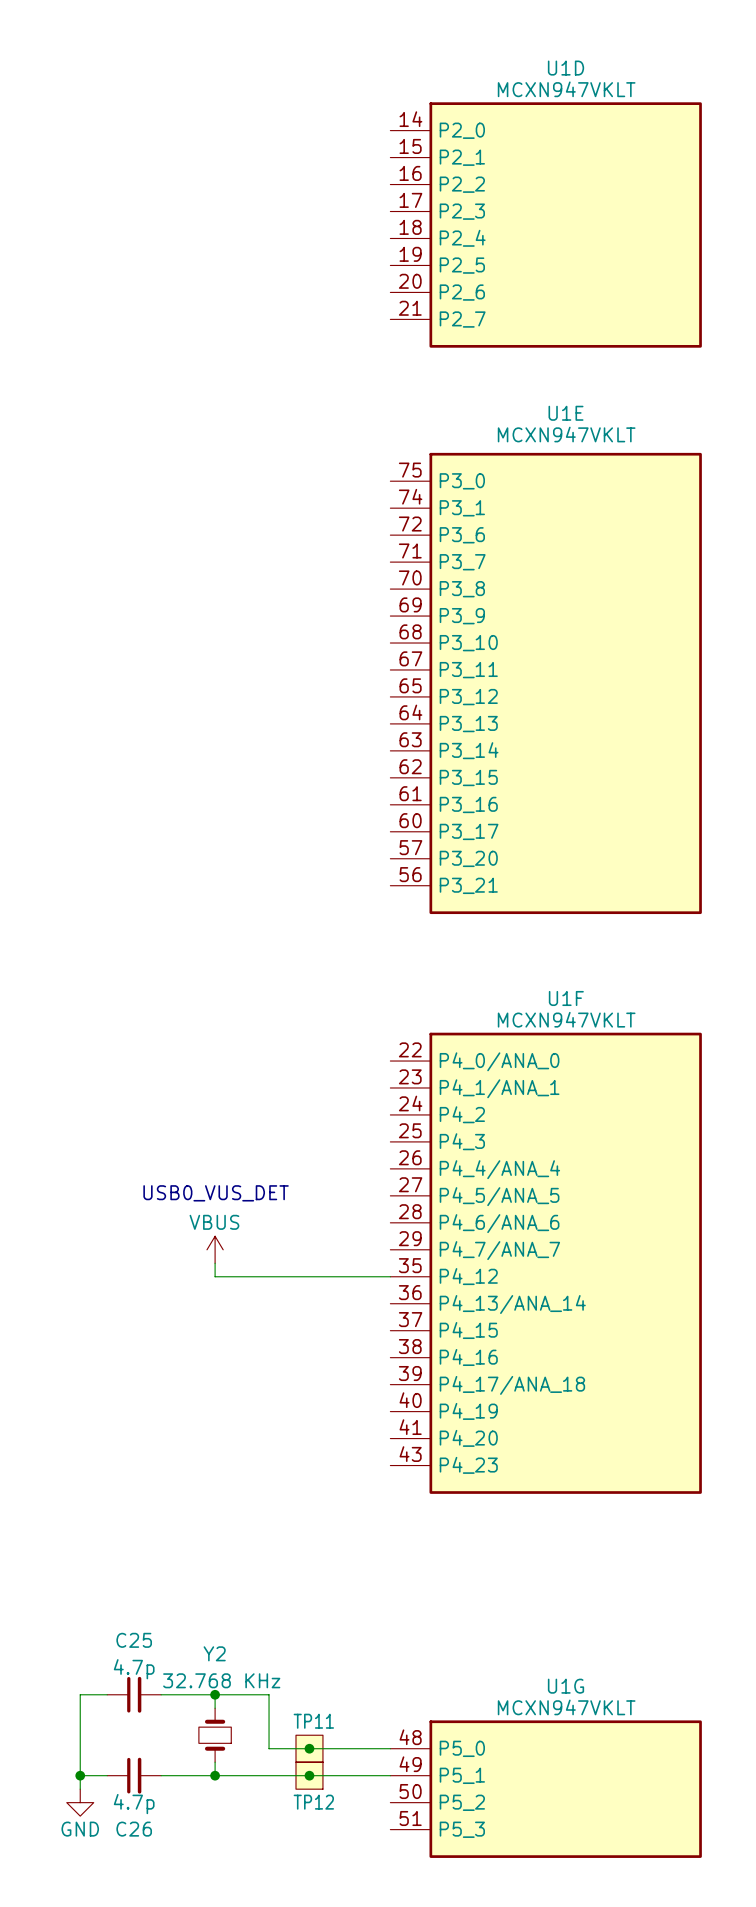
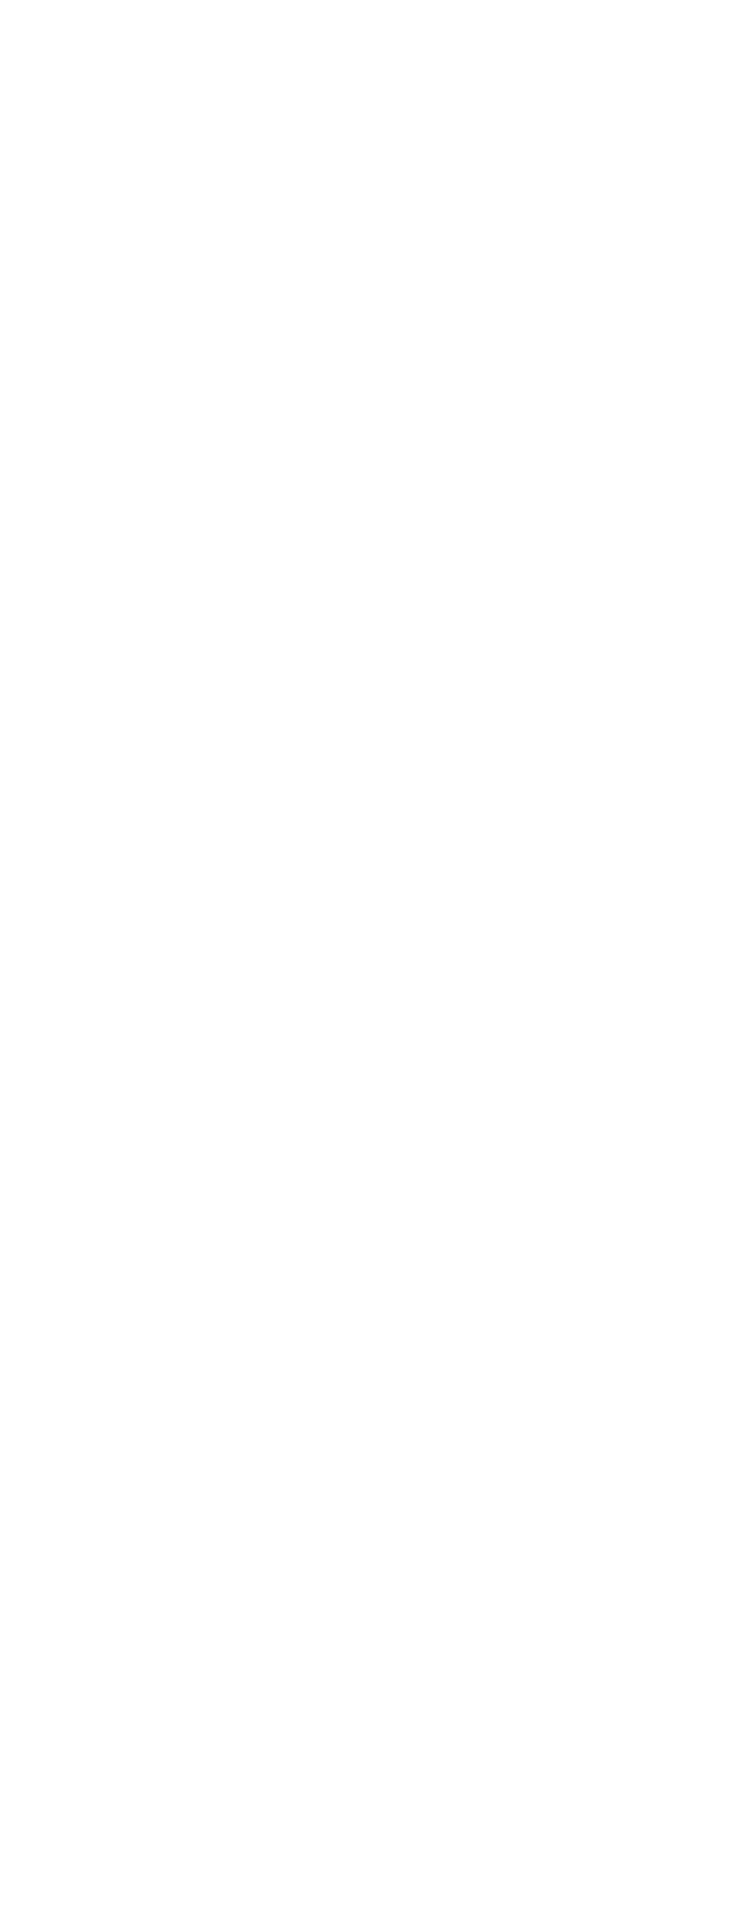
U1D: MCXN947VKLT (546, 225) -> none
U1E: MCXN947VKLT (546, 683) -> none
text: USB0_VUS_DET (216, 1193) -> none
power symbol: VBUS (215, 1249) -> none
wire: (215, 1263) (215, 1276) (390, 1276) -> none
U1F: MCXN947VKLT (546, 1263) -> none
wire: (107, 1694) (80, 1694) (80, 1789) -> none
C25: 4.7p (134, 1694) -> none
wire: (161, 1694) (269, 1694) (269, 1748) (390, 1748) -> none
wire: (215, 1694) (215, 1708) -> none
junction: (215, 1694) -> none
Y2: 32.768 KHz (215, 1735) -> none
junction: (309, 1748) -> none
TP11: (309, 1748) -> none
wire: (215, 1762) (215, 1775) -> none
wire: (80, 1775) (107, 1775) -> none
junction: (80, 1775) -> none
C26: 4.7p (134, 1775) -> none
wire: (161, 1775) (390, 1775) -> none
junction: (215, 1775) -> none
junction: (309, 1775) -> none
TP12: (309, 1775) -> none
U1G: MCXN947VKLT (546, 1789) -> none
power symbol: GND (80, 1802) -> none

